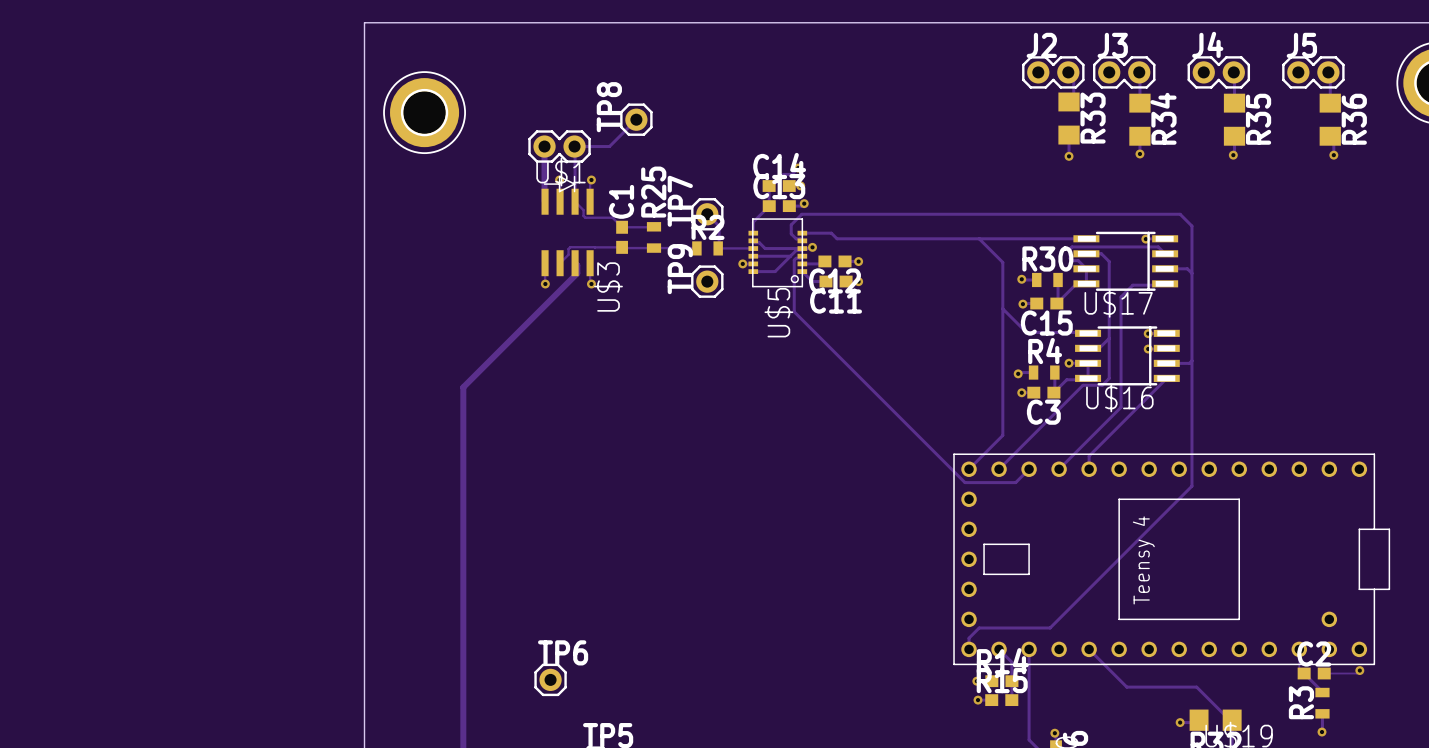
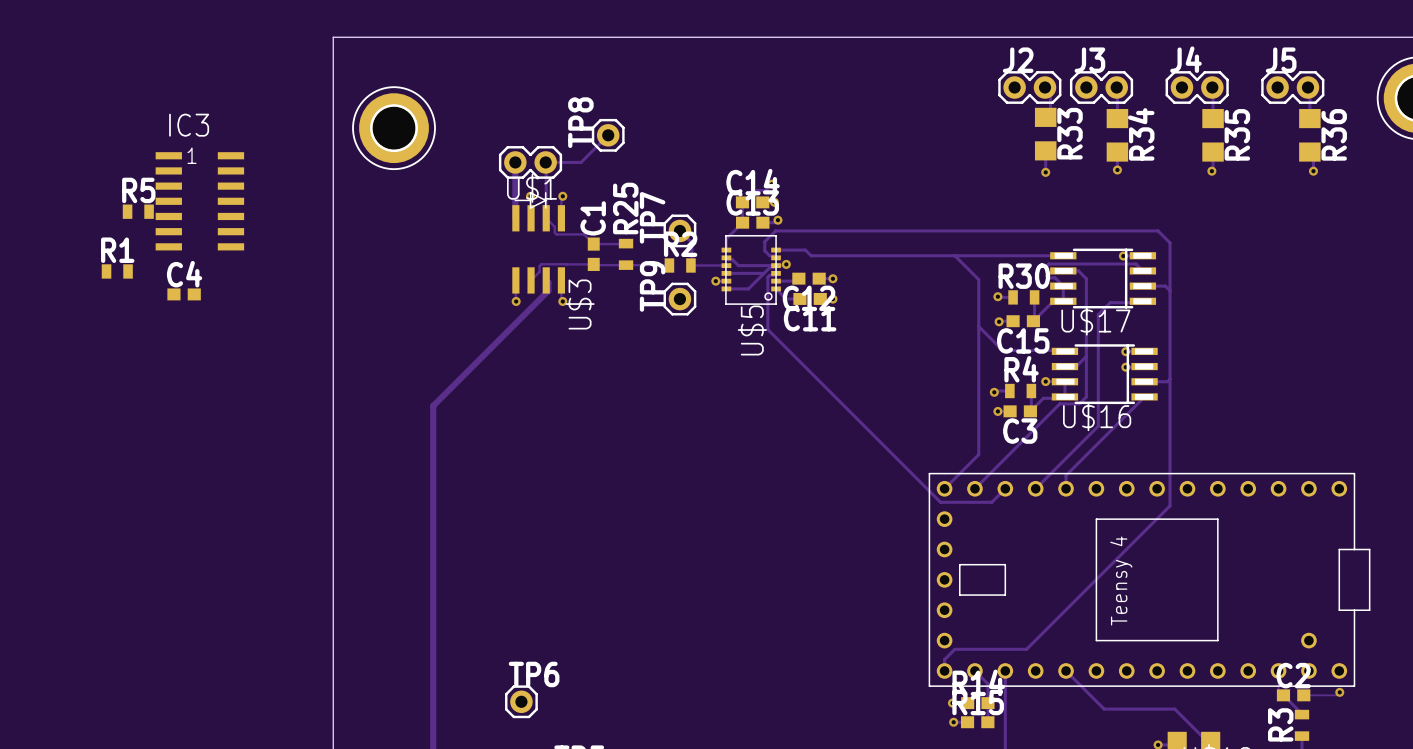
IC3: none -> (199, 201)
R5: none -> (138, 211)
R1: none -> (117, 271)
C4: none -> (184, 294)

